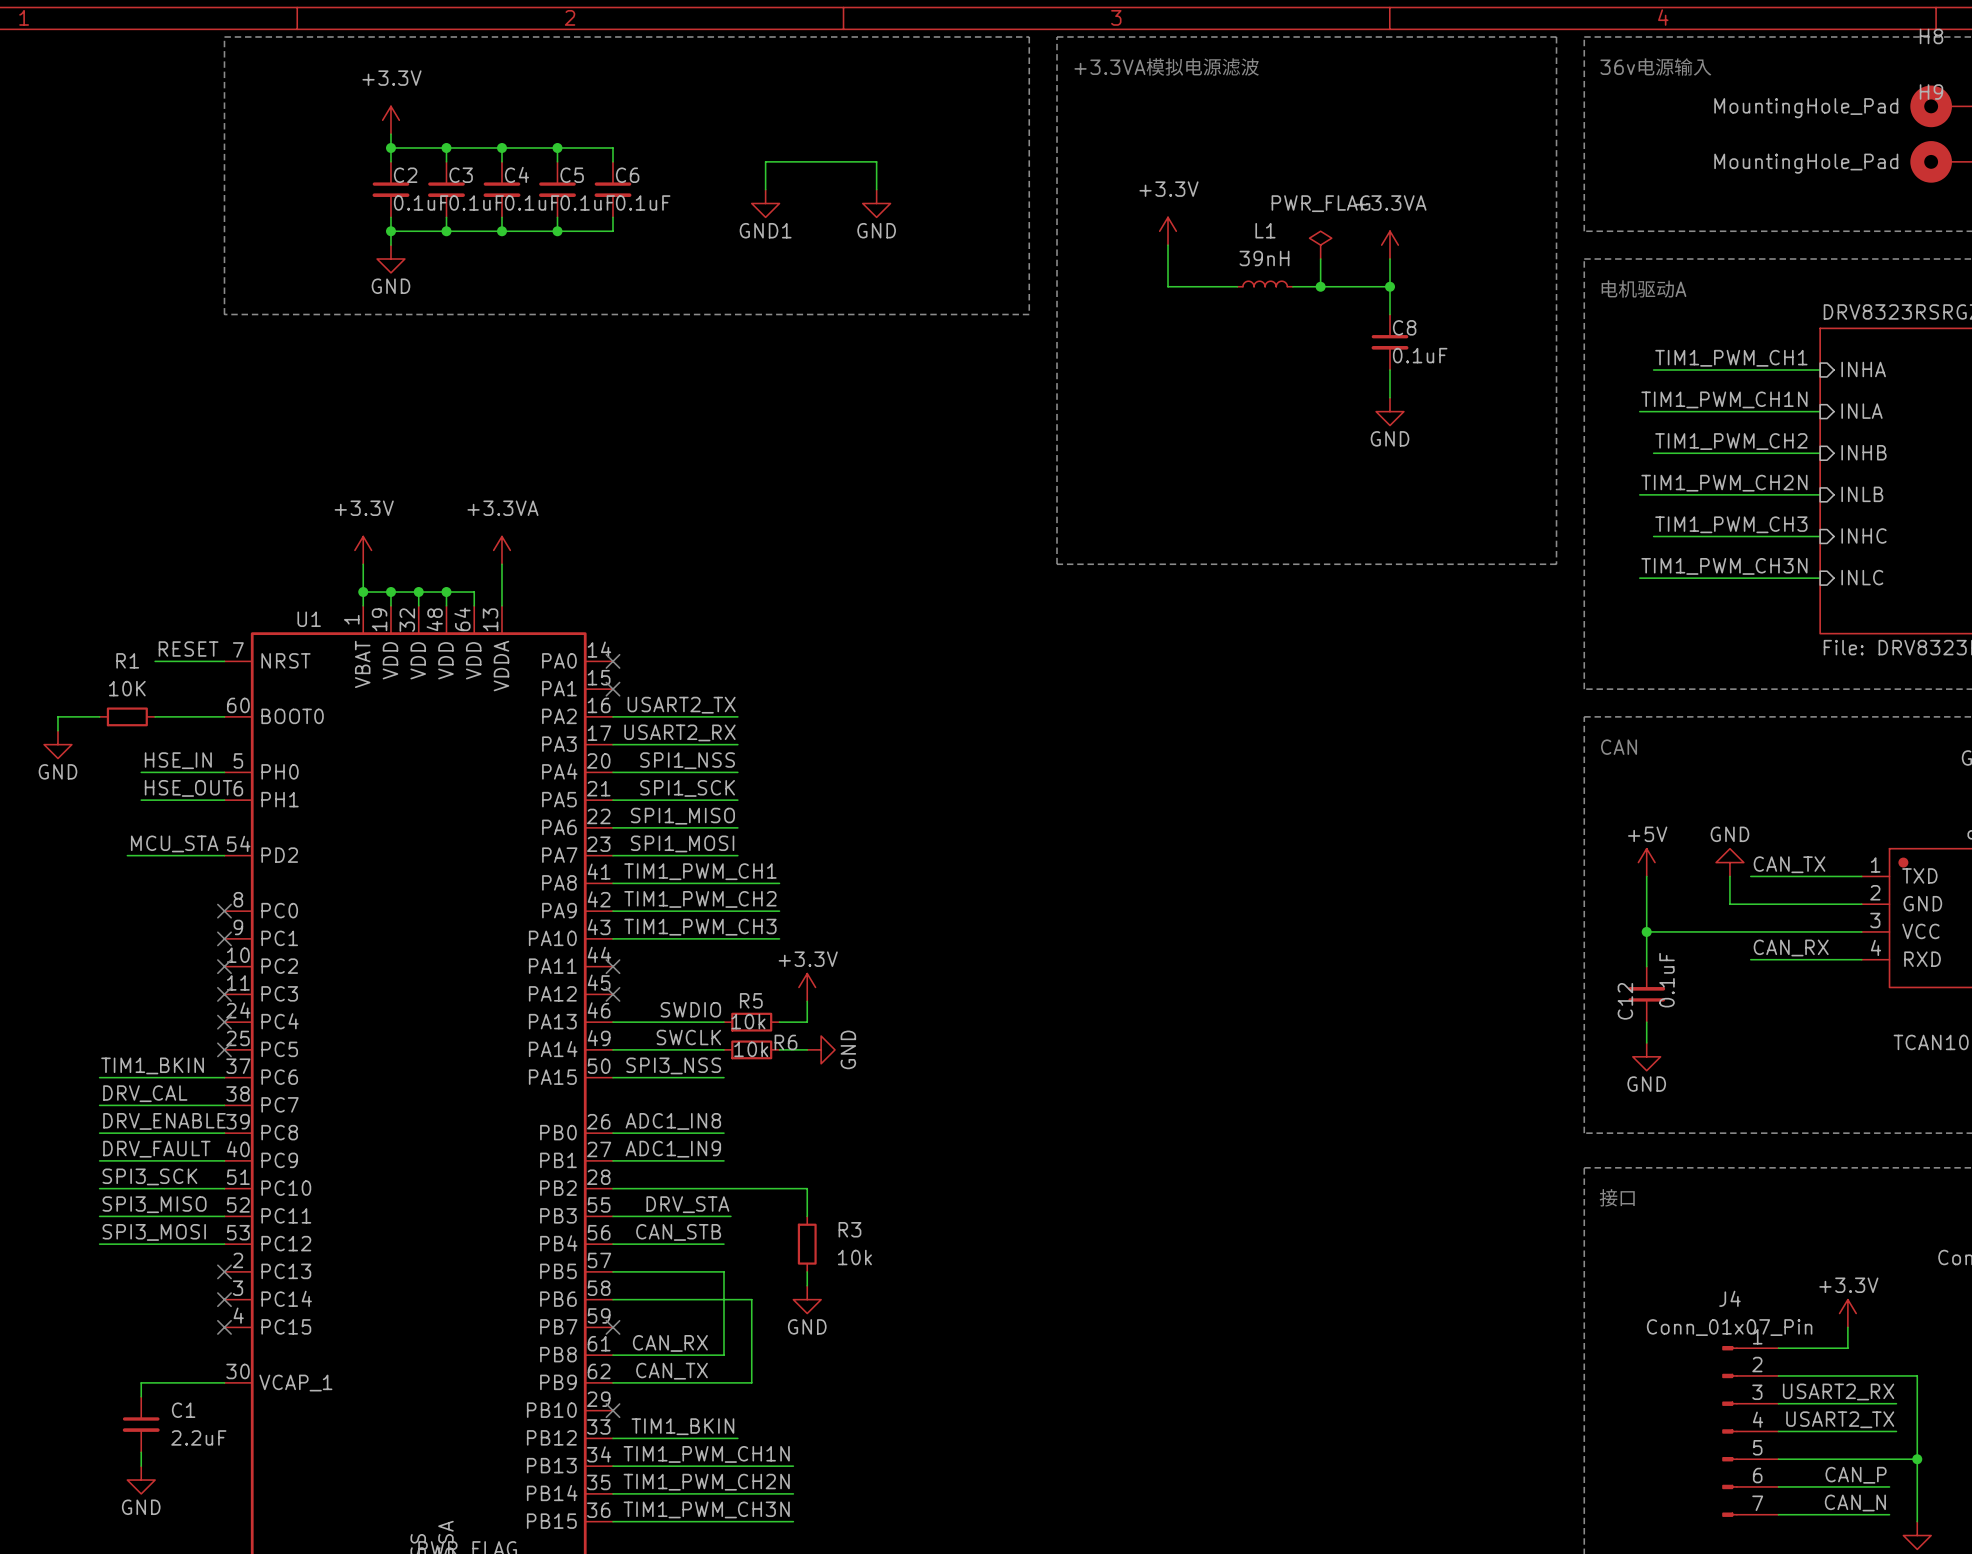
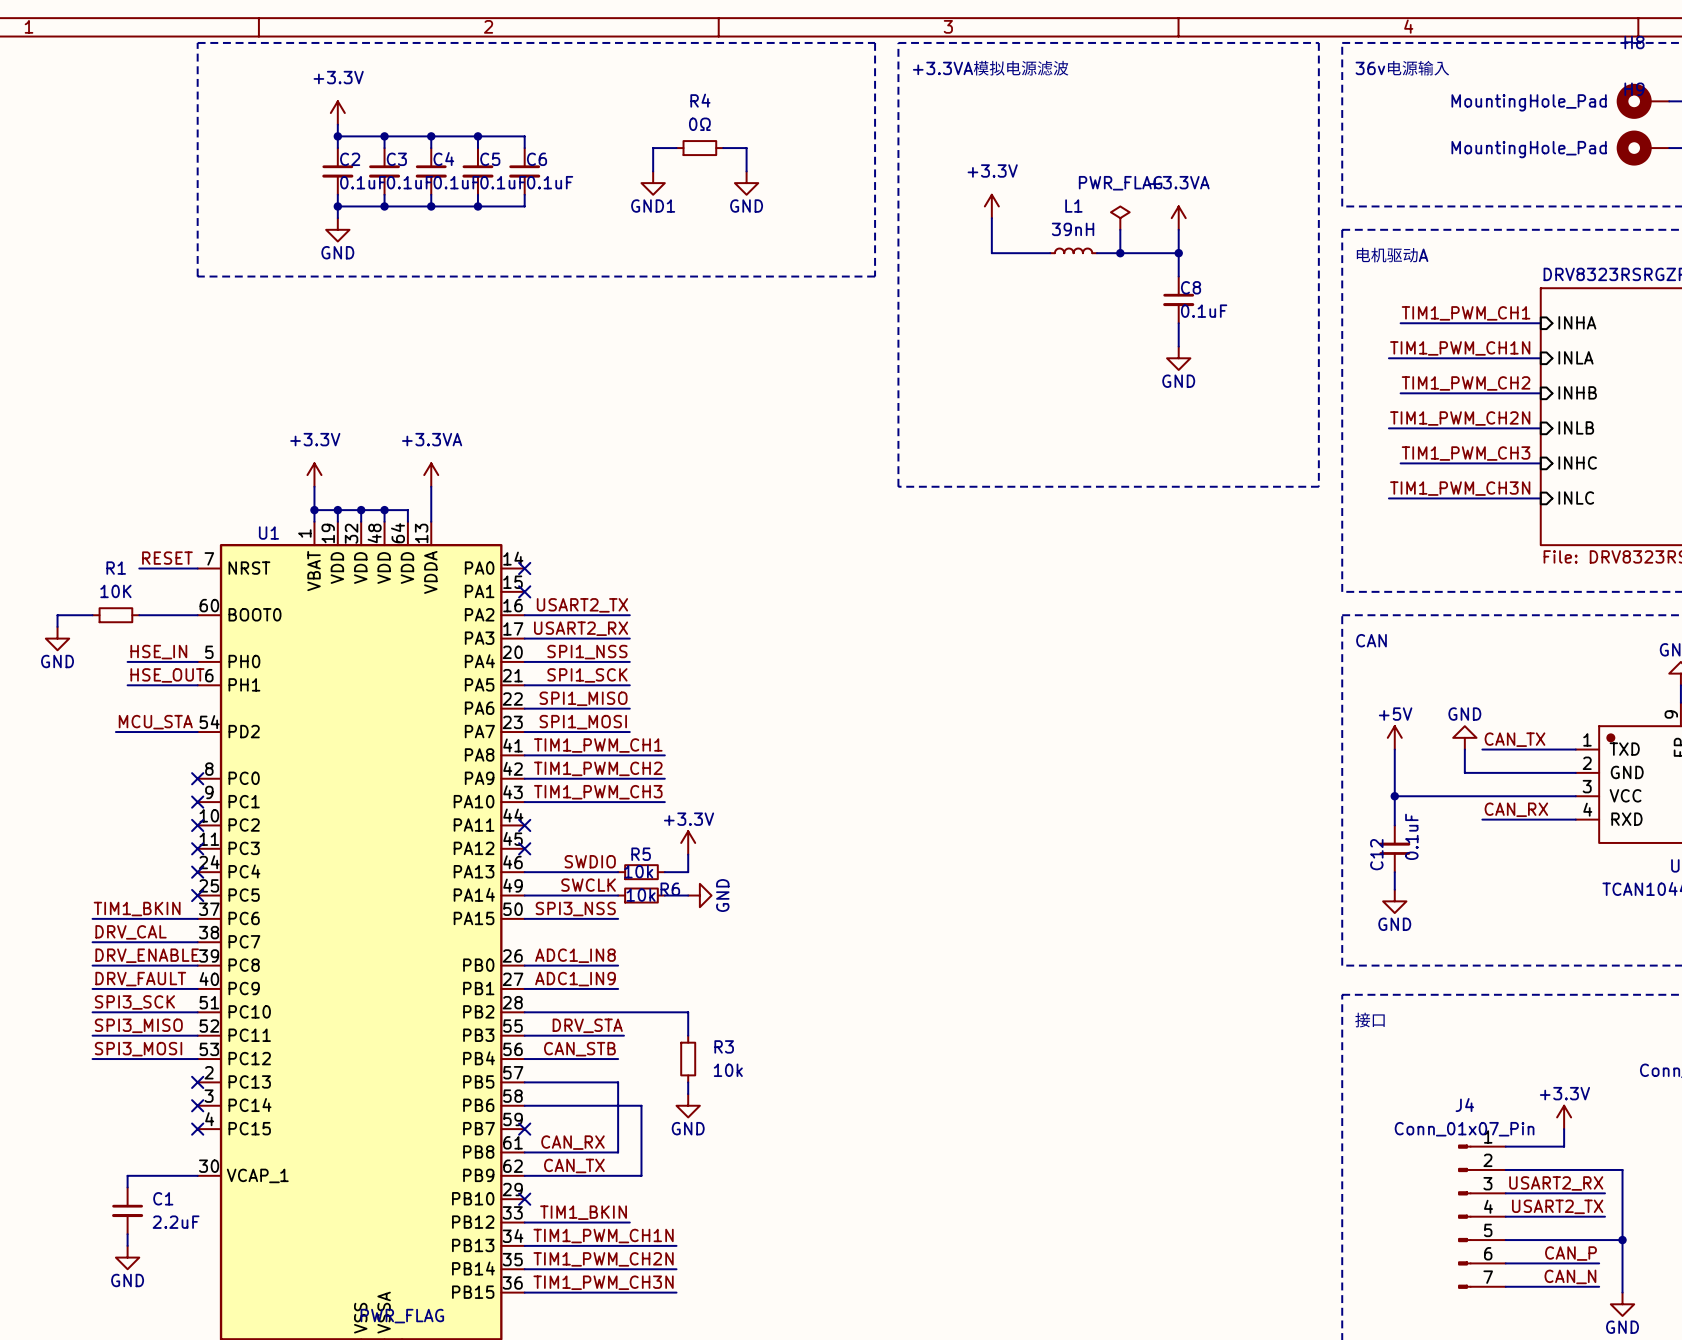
wire: (793, 161) (848, 161) -> none
R4: none -> 0Ω (699, 148)

